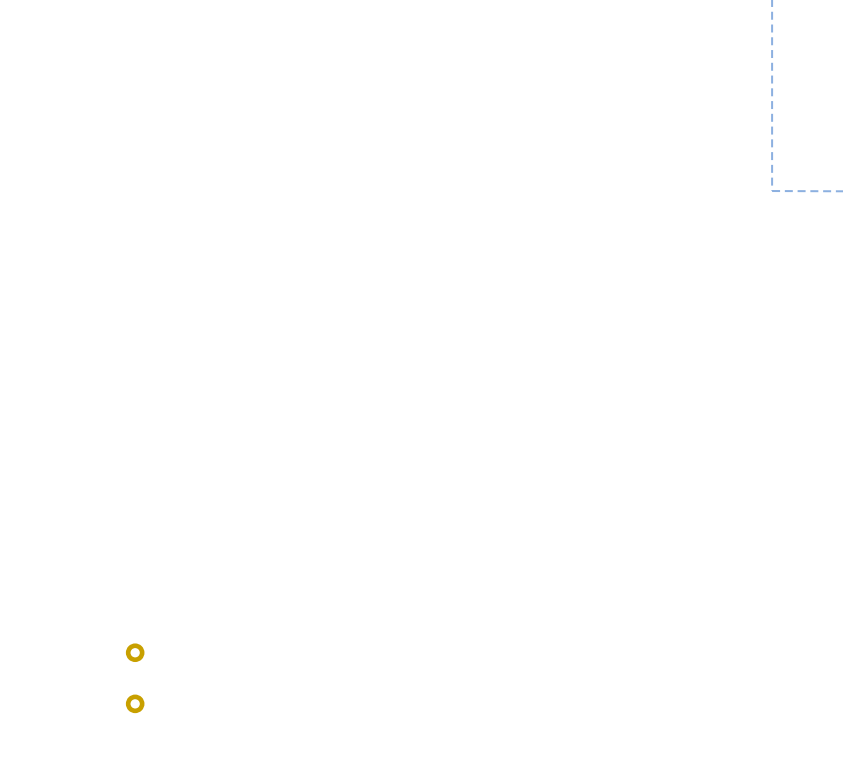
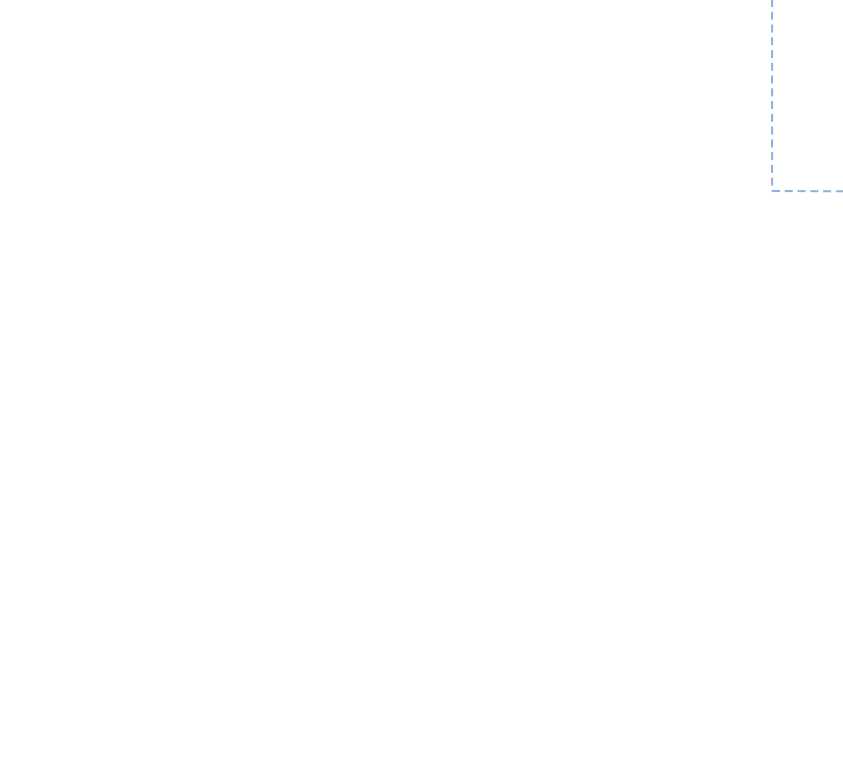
part: (135, 678) -> none

